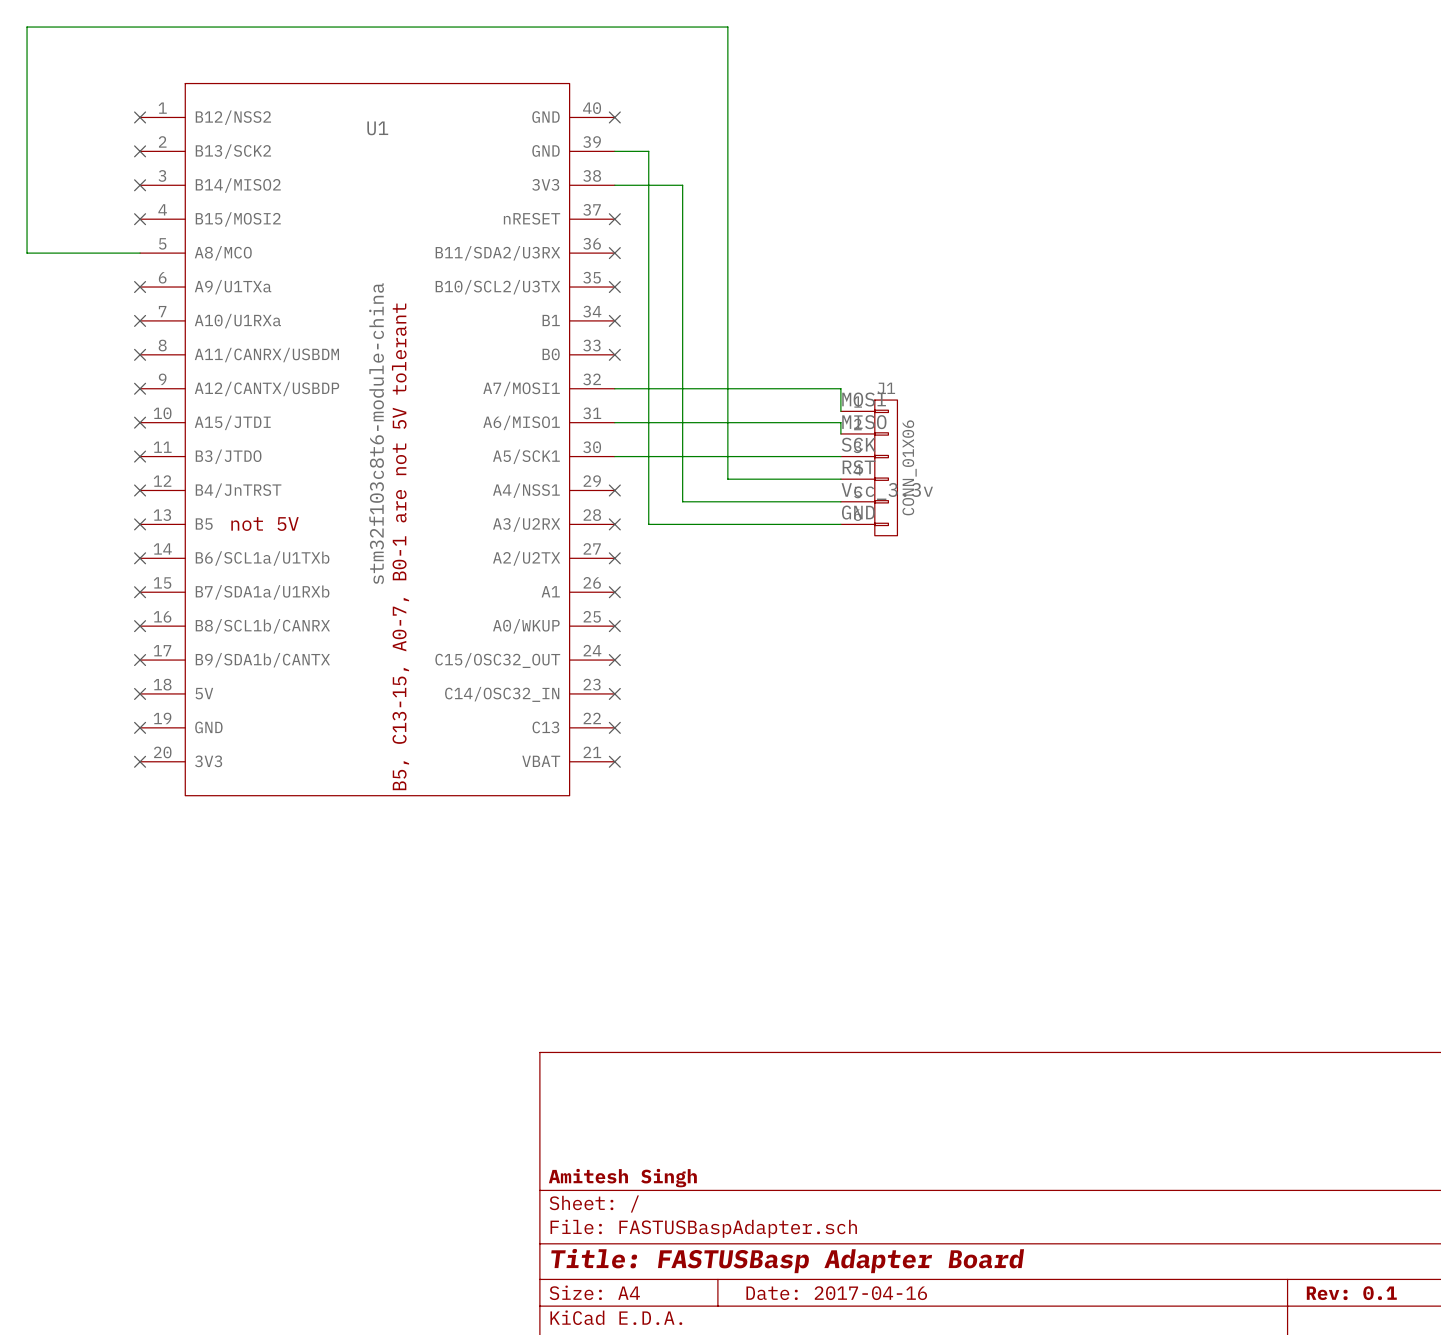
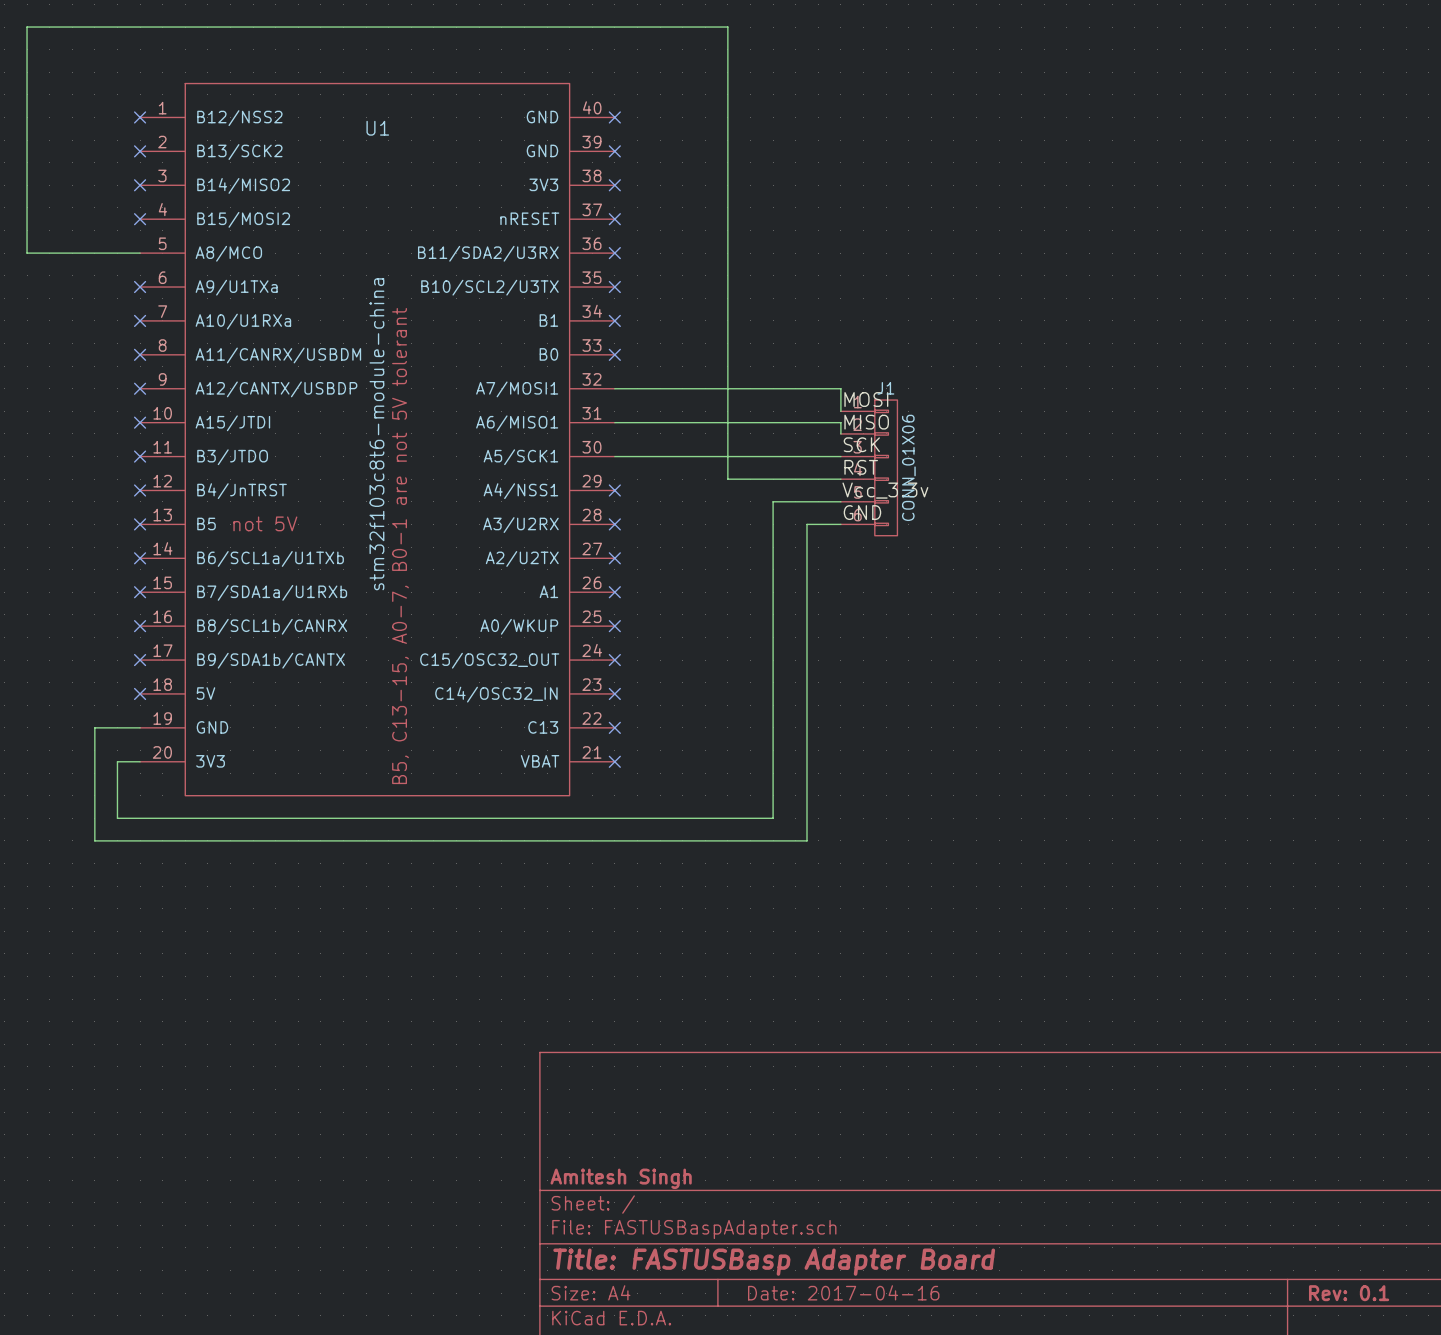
wire: (614, 151) (648, 151) (648, 524) (806, 524) -> (140, 727) (94, 727) (94, 840) (806, 840) (806, 524)
no-connect mark: none -> (614, 151)
wire: (614, 185) (682, 185) (682, 501) (773, 501) -> (140, 761) (117, 761) (117, 818) (773, 818) (773, 501)
no-connect mark: none -> (614, 185)
no-connect mark: (140, 727) -> none
no-connect mark: (140, 761) -> none

